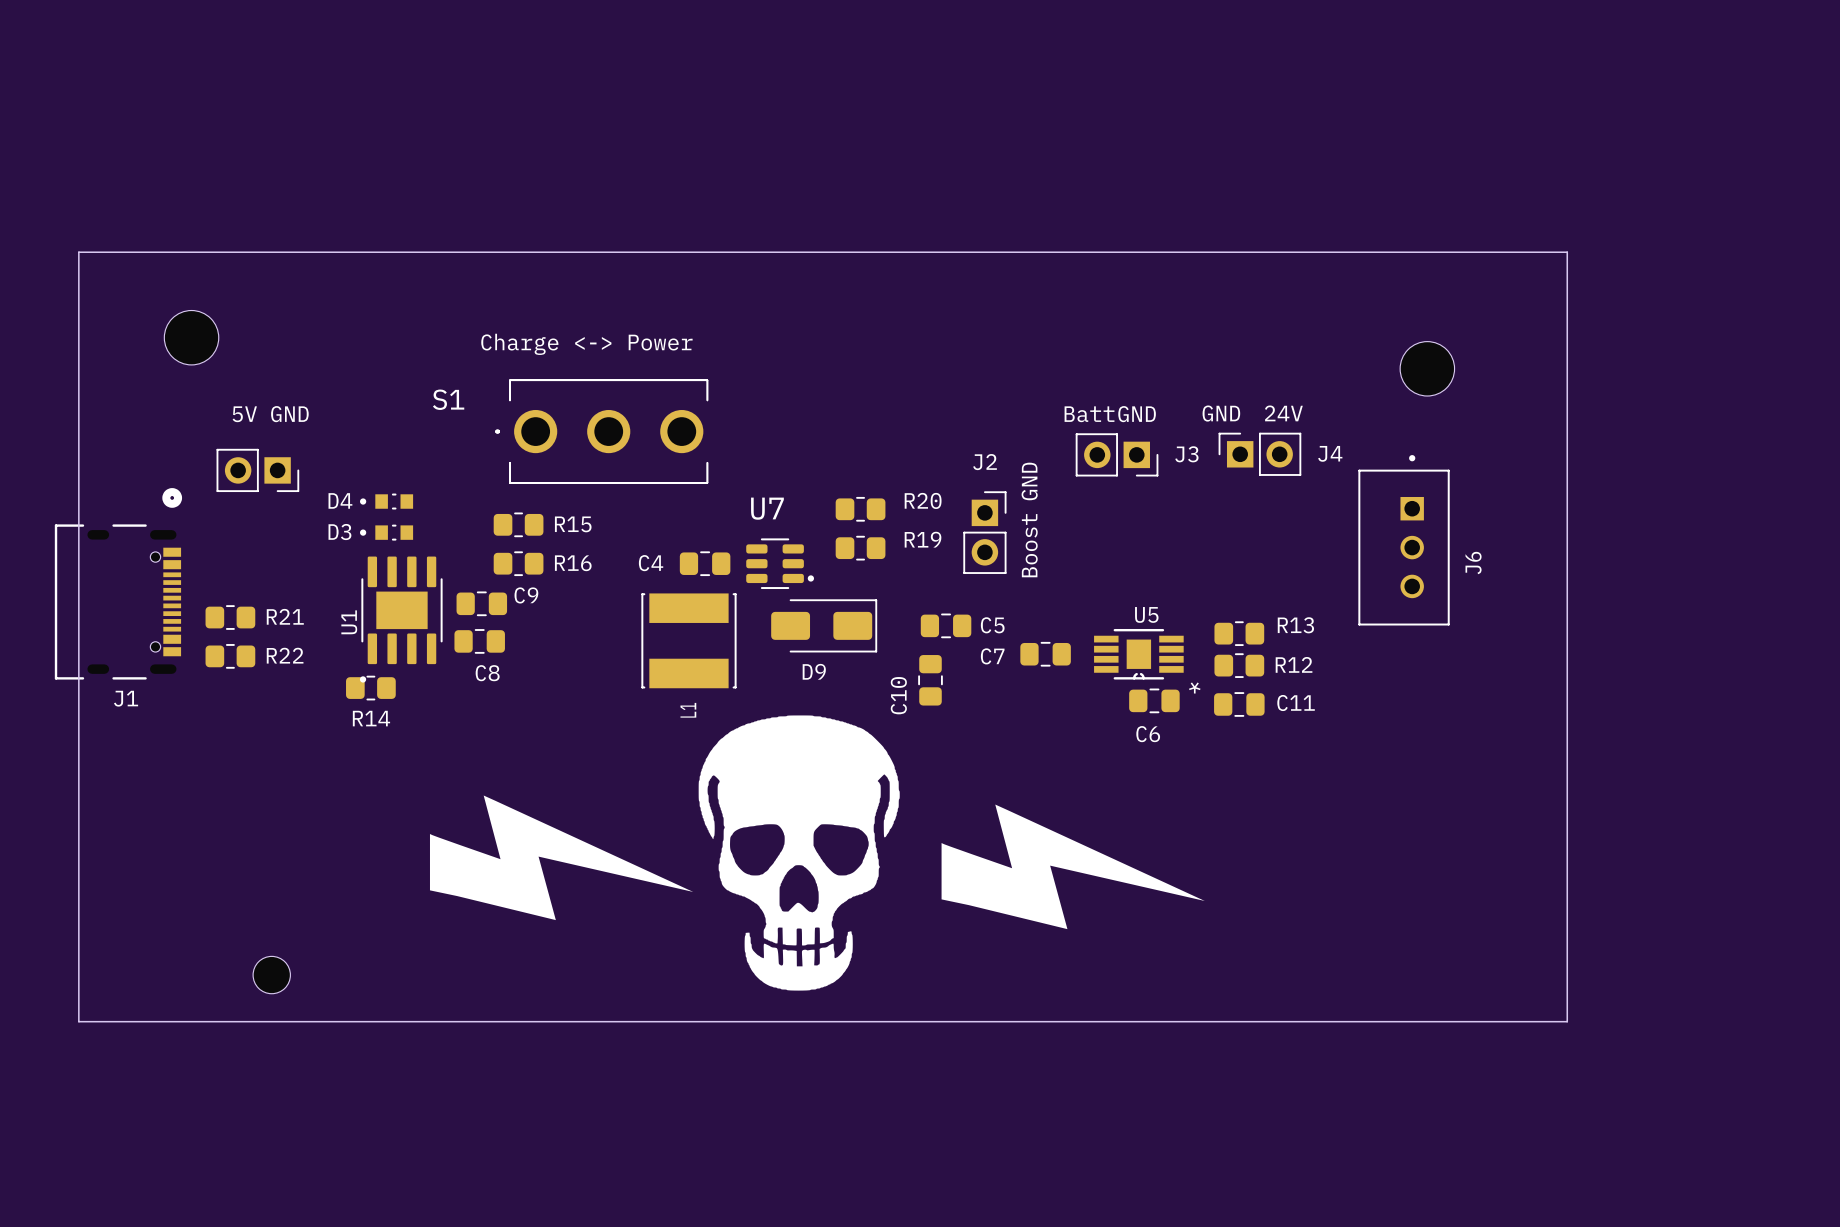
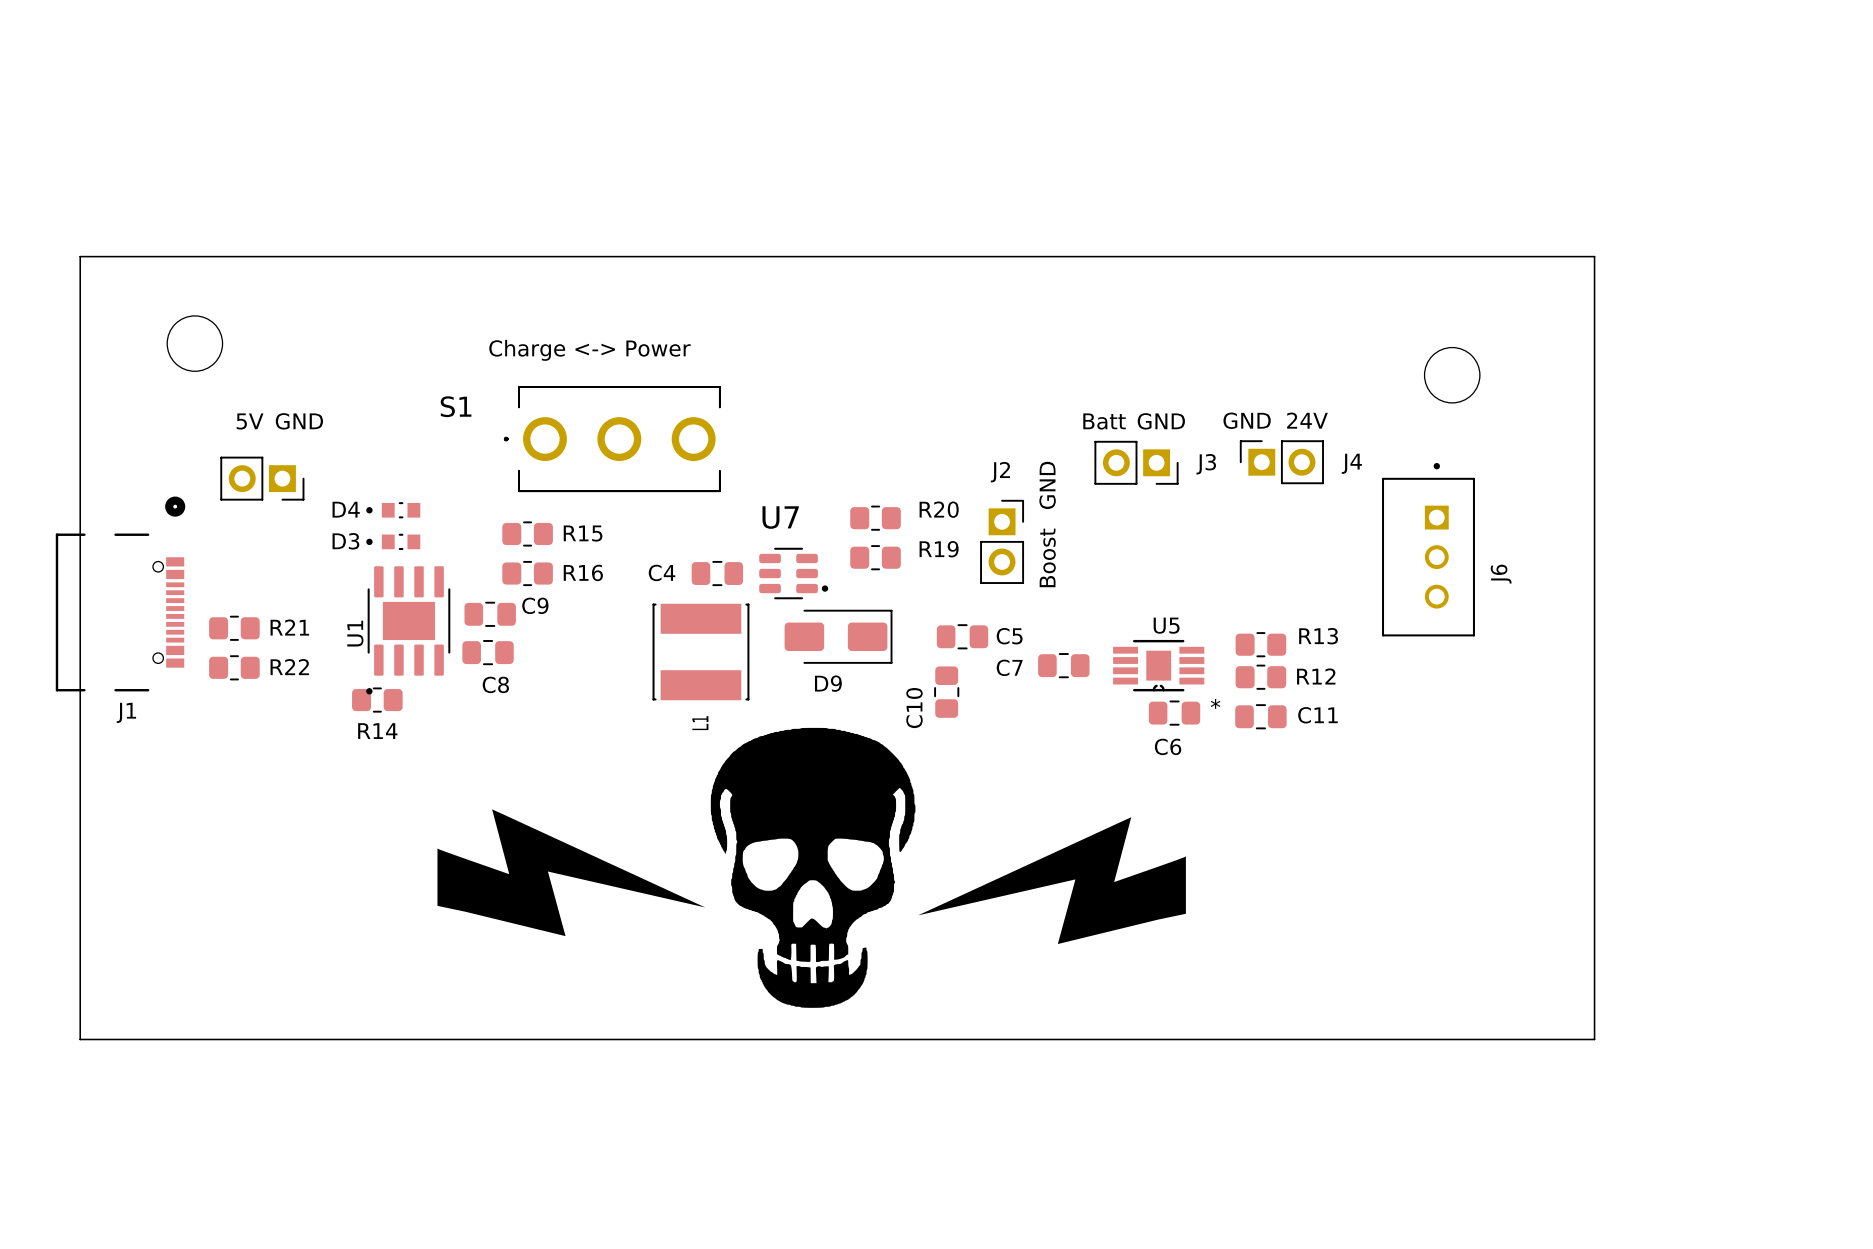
drawing: none -> [918, 817, 1186, 945]
drawing: [941, 804, 1205, 930] -> none
part: (271, 975) -> none

